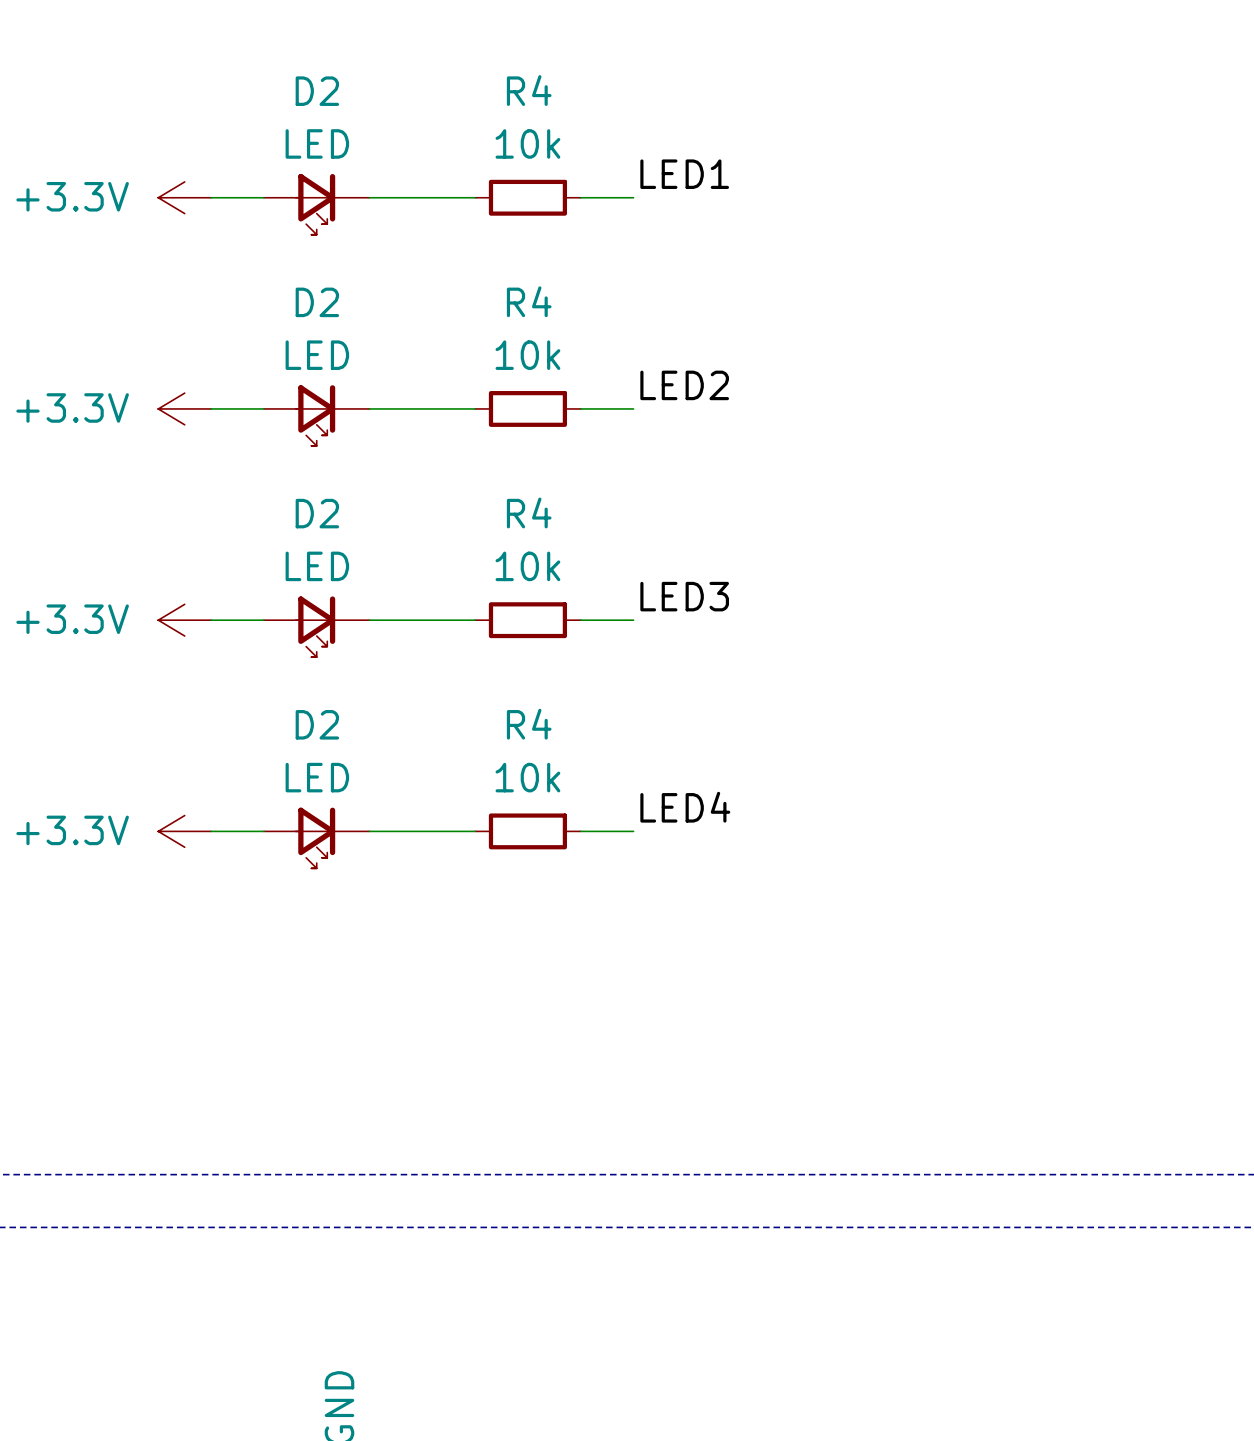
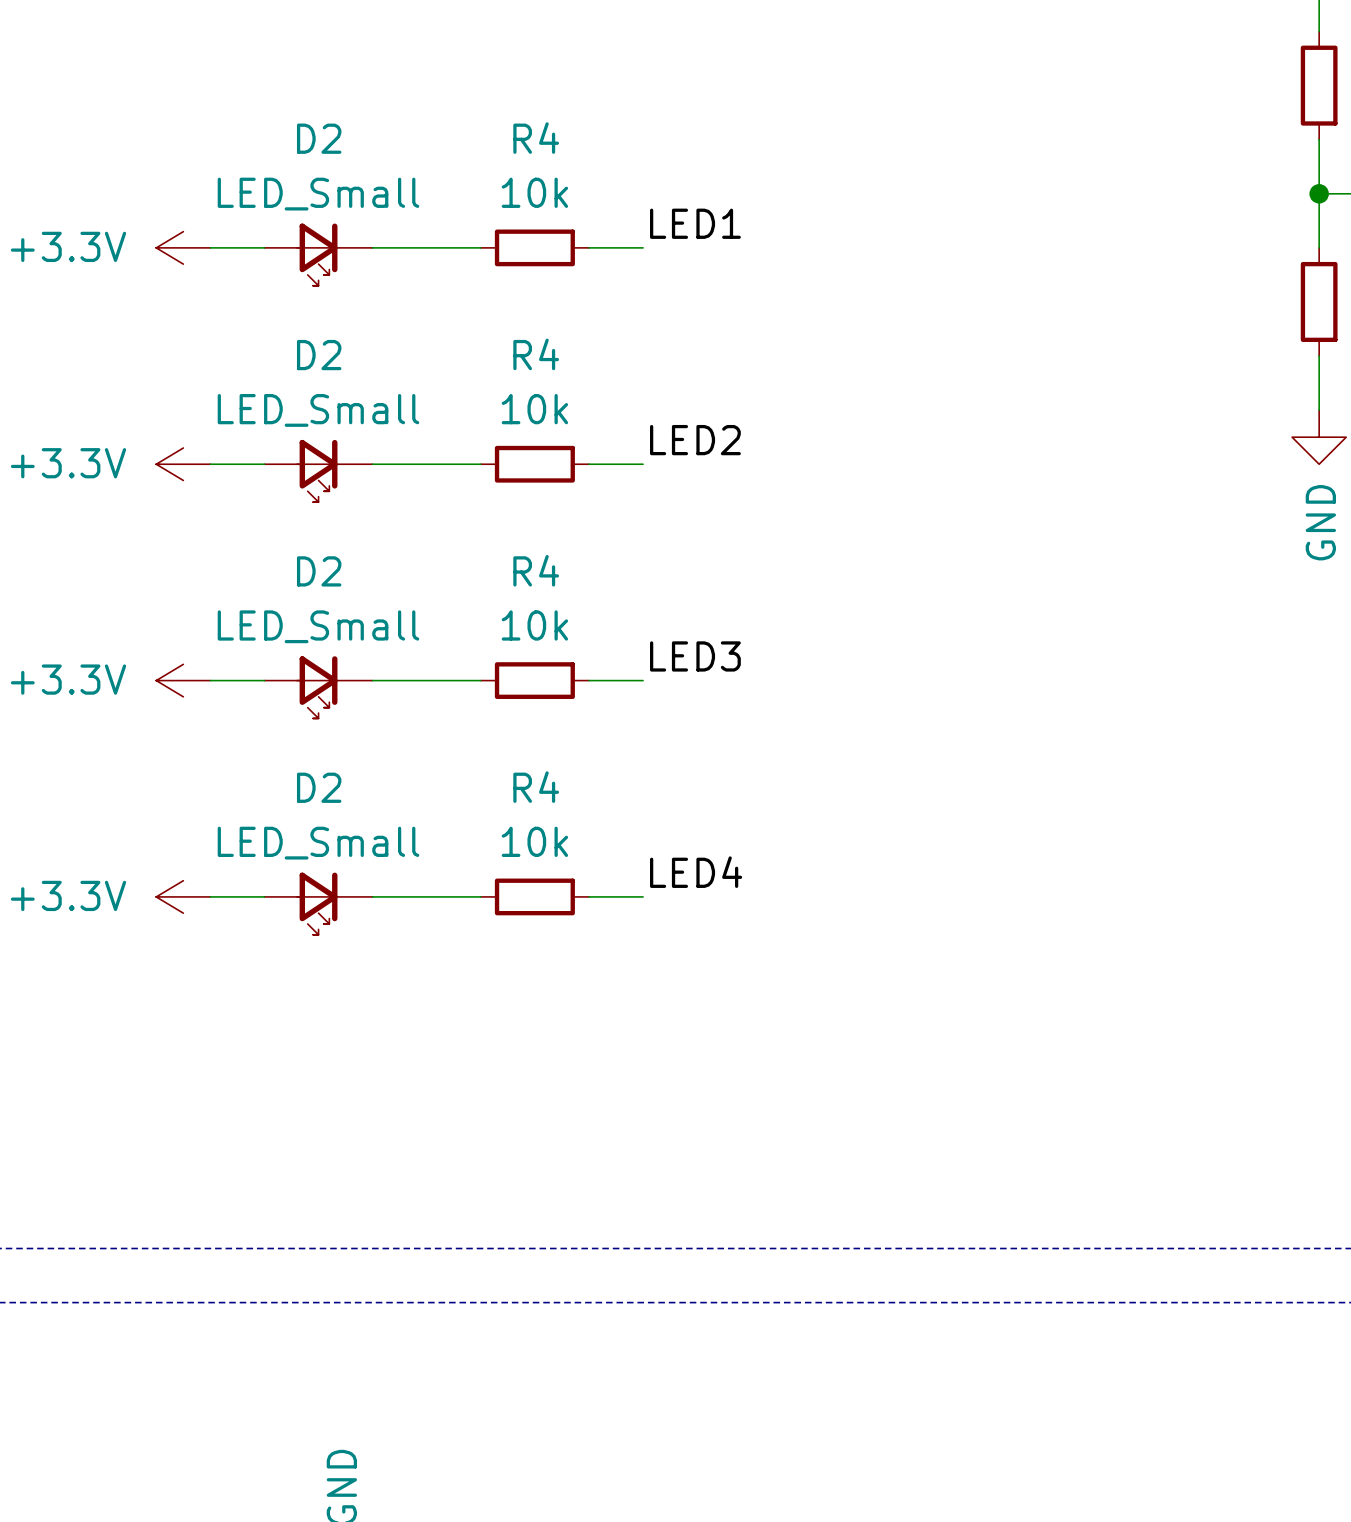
D2 value: LED (317, 143) -> LED_Small (318, 194)
D2 value: LED (317, 355) -> LED_Small (318, 410)
D2 value: LED (317, 566) -> LED_Small (318, 626)
D2 value: LED (317, 777) -> LED_Small (318, 843)

